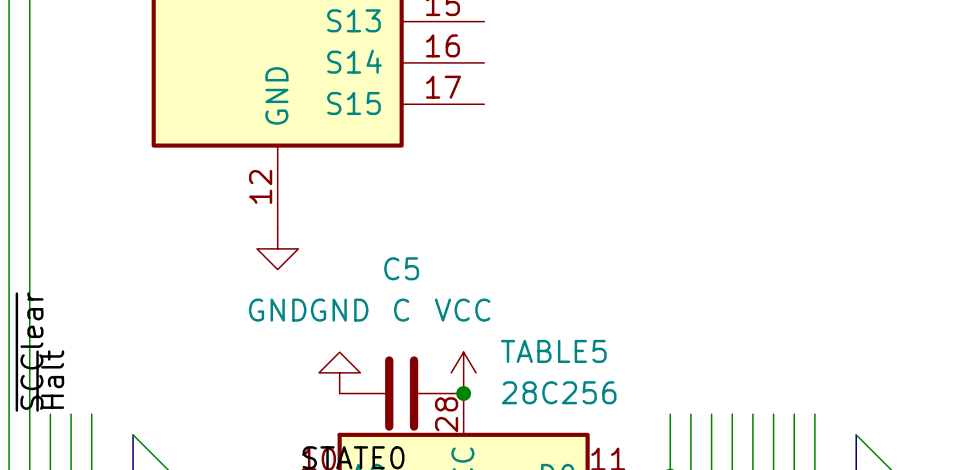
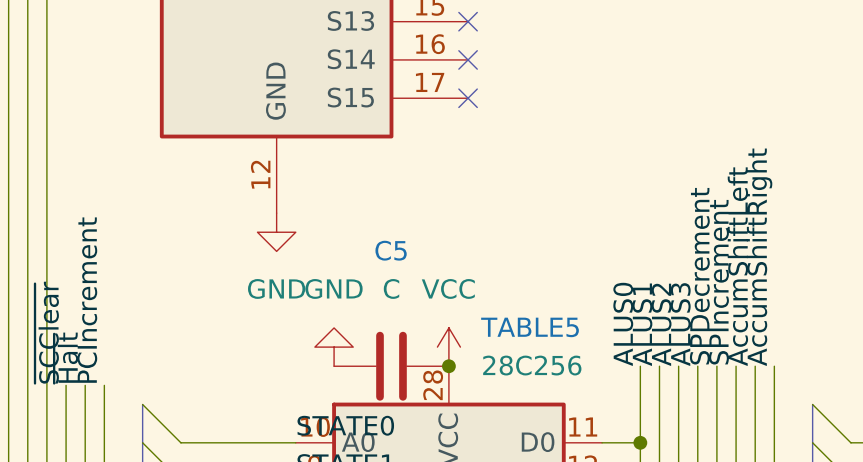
no-connect mark: none -> (468, 21)
no-connect mark: none -> (468, 59)
no-connect mark: none -> (468, 98)
label: none -> AccumShiftRight (759, 257)
label: none -> AccumShiftLeft (737, 266)
label: none -> SPDecrement (699, 276)
label: none -> SPIncrement (718, 282)
label: none -> PCIncrement (87, 300)
label: none -> ALUS0 (623, 324)
label: none -> ALUS1 (642, 324)
label: none -> ALUS2 (661, 324)
label: none -> ALUS3 (680, 324)
wire: none -> (640, 366) (640, 385)
wire: none -> (659, 366) (659, 385)
wire: none -> (678, 366) (678, 385)
wire: none -> (697, 366) (697, 385)
wire: none -> (716, 366) (716, 385)
wire: none -> (736, 366) (736, 385)
wire: none -> (755, 366) (755, 385)
wire: none -> (774, 366) (774, 385)

